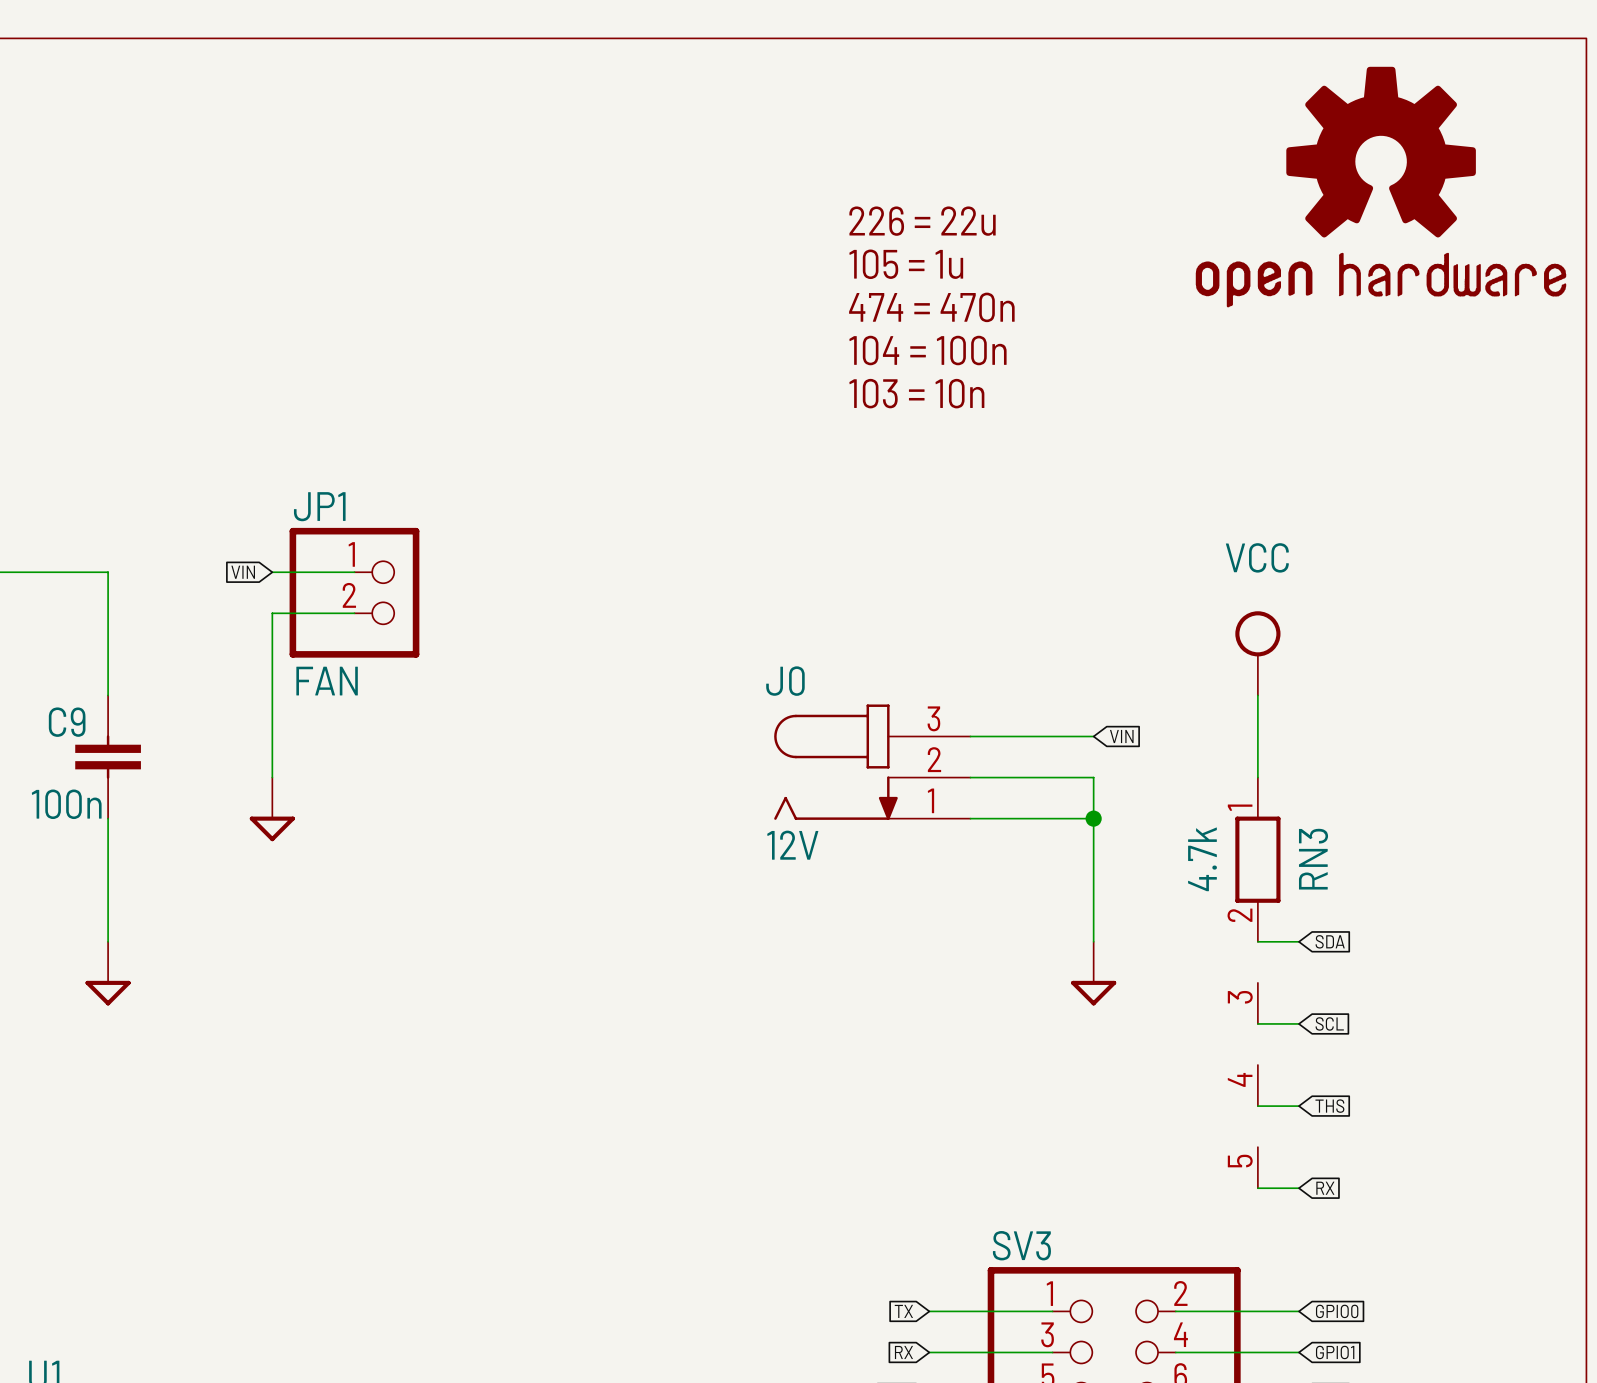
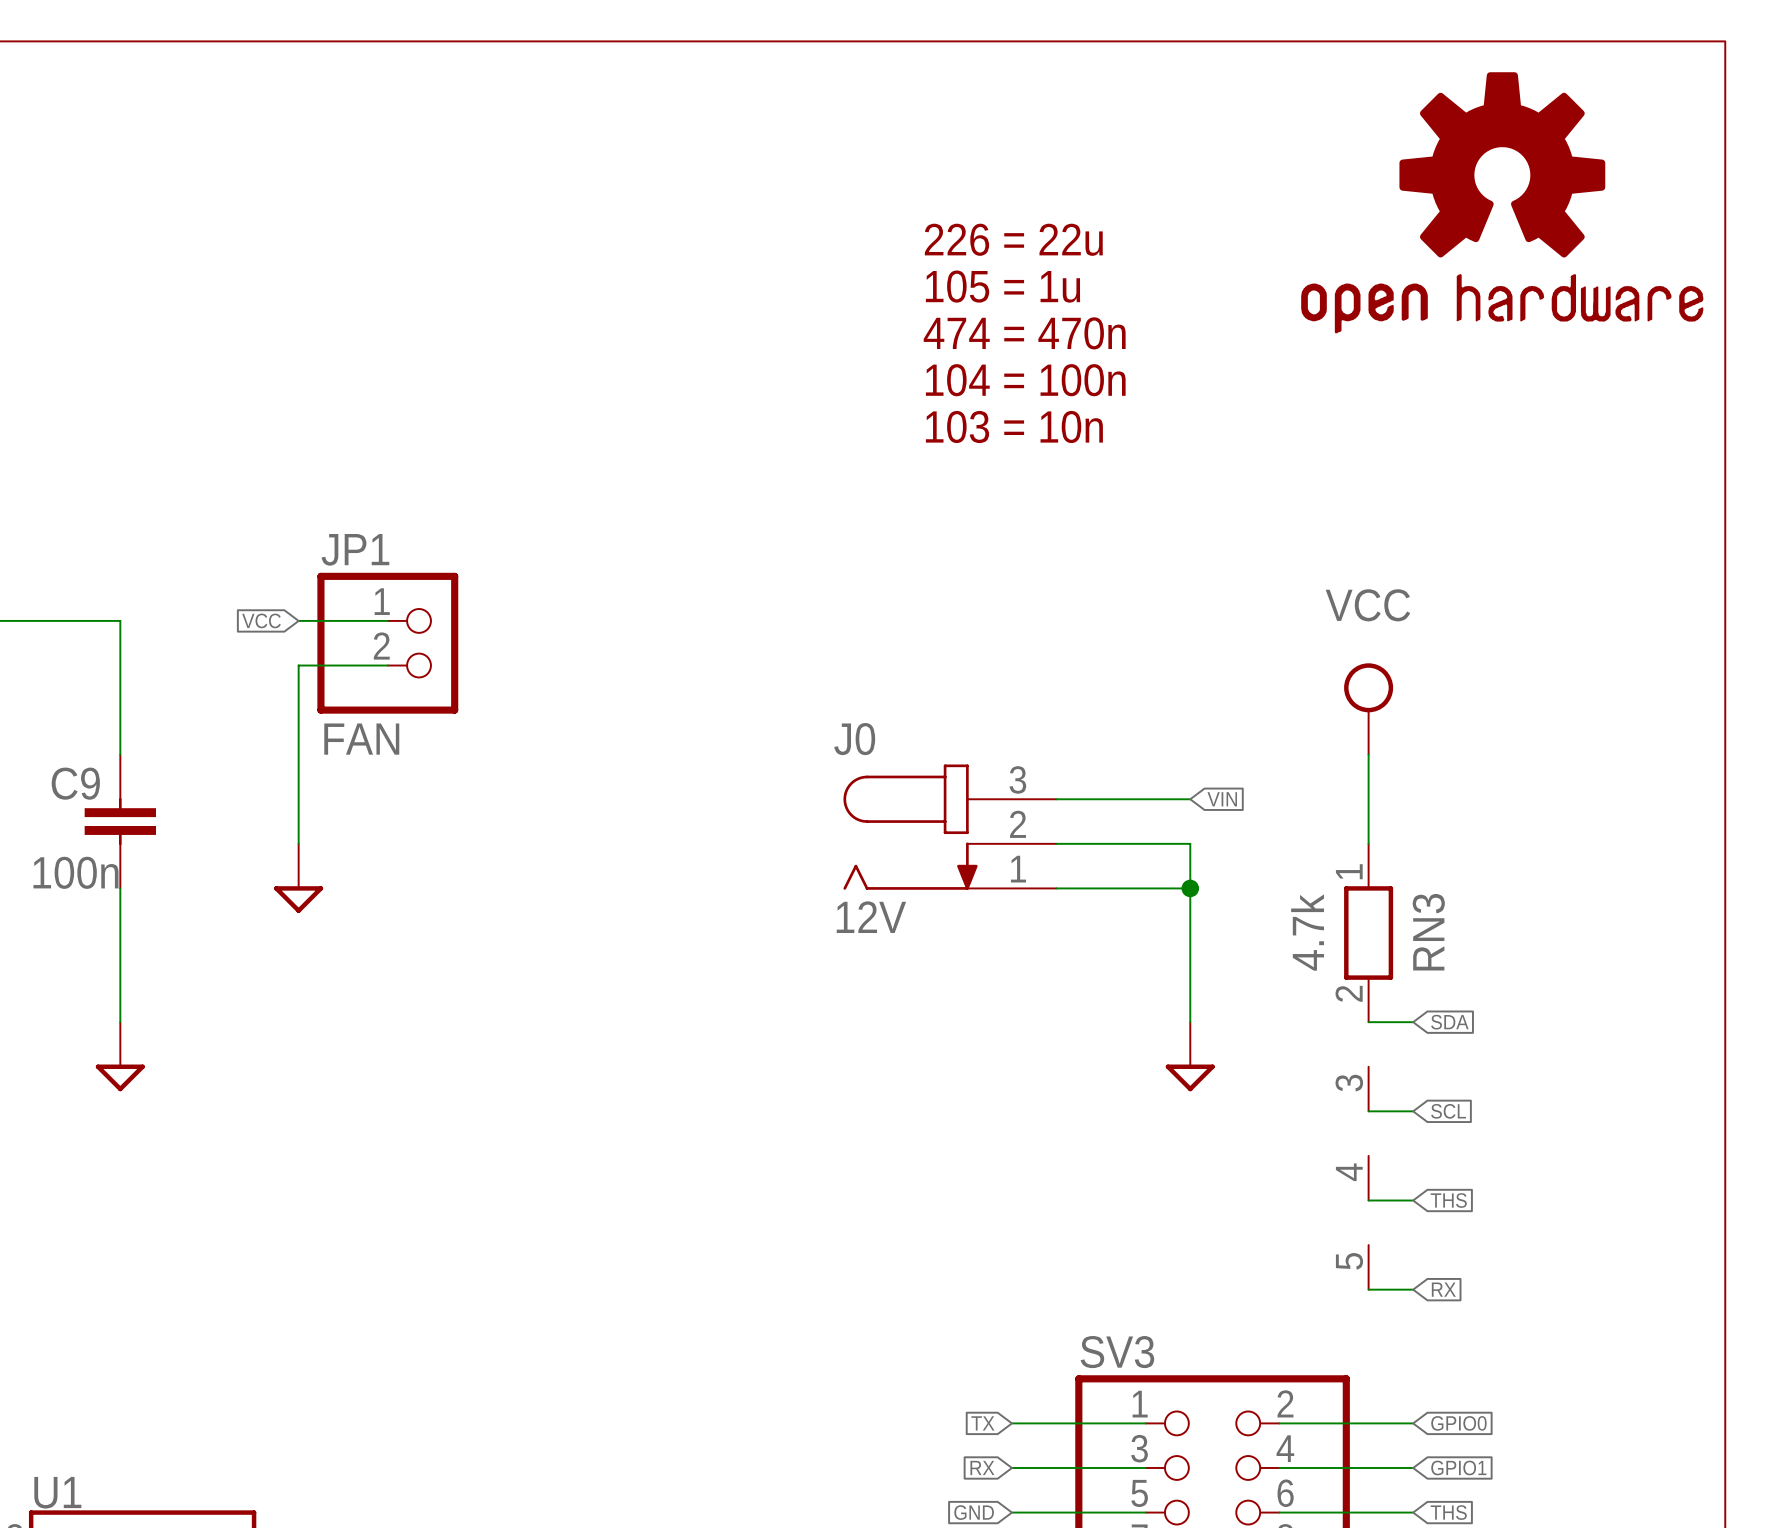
global label: VIN (243, 572) -> VCC (261, 620)

